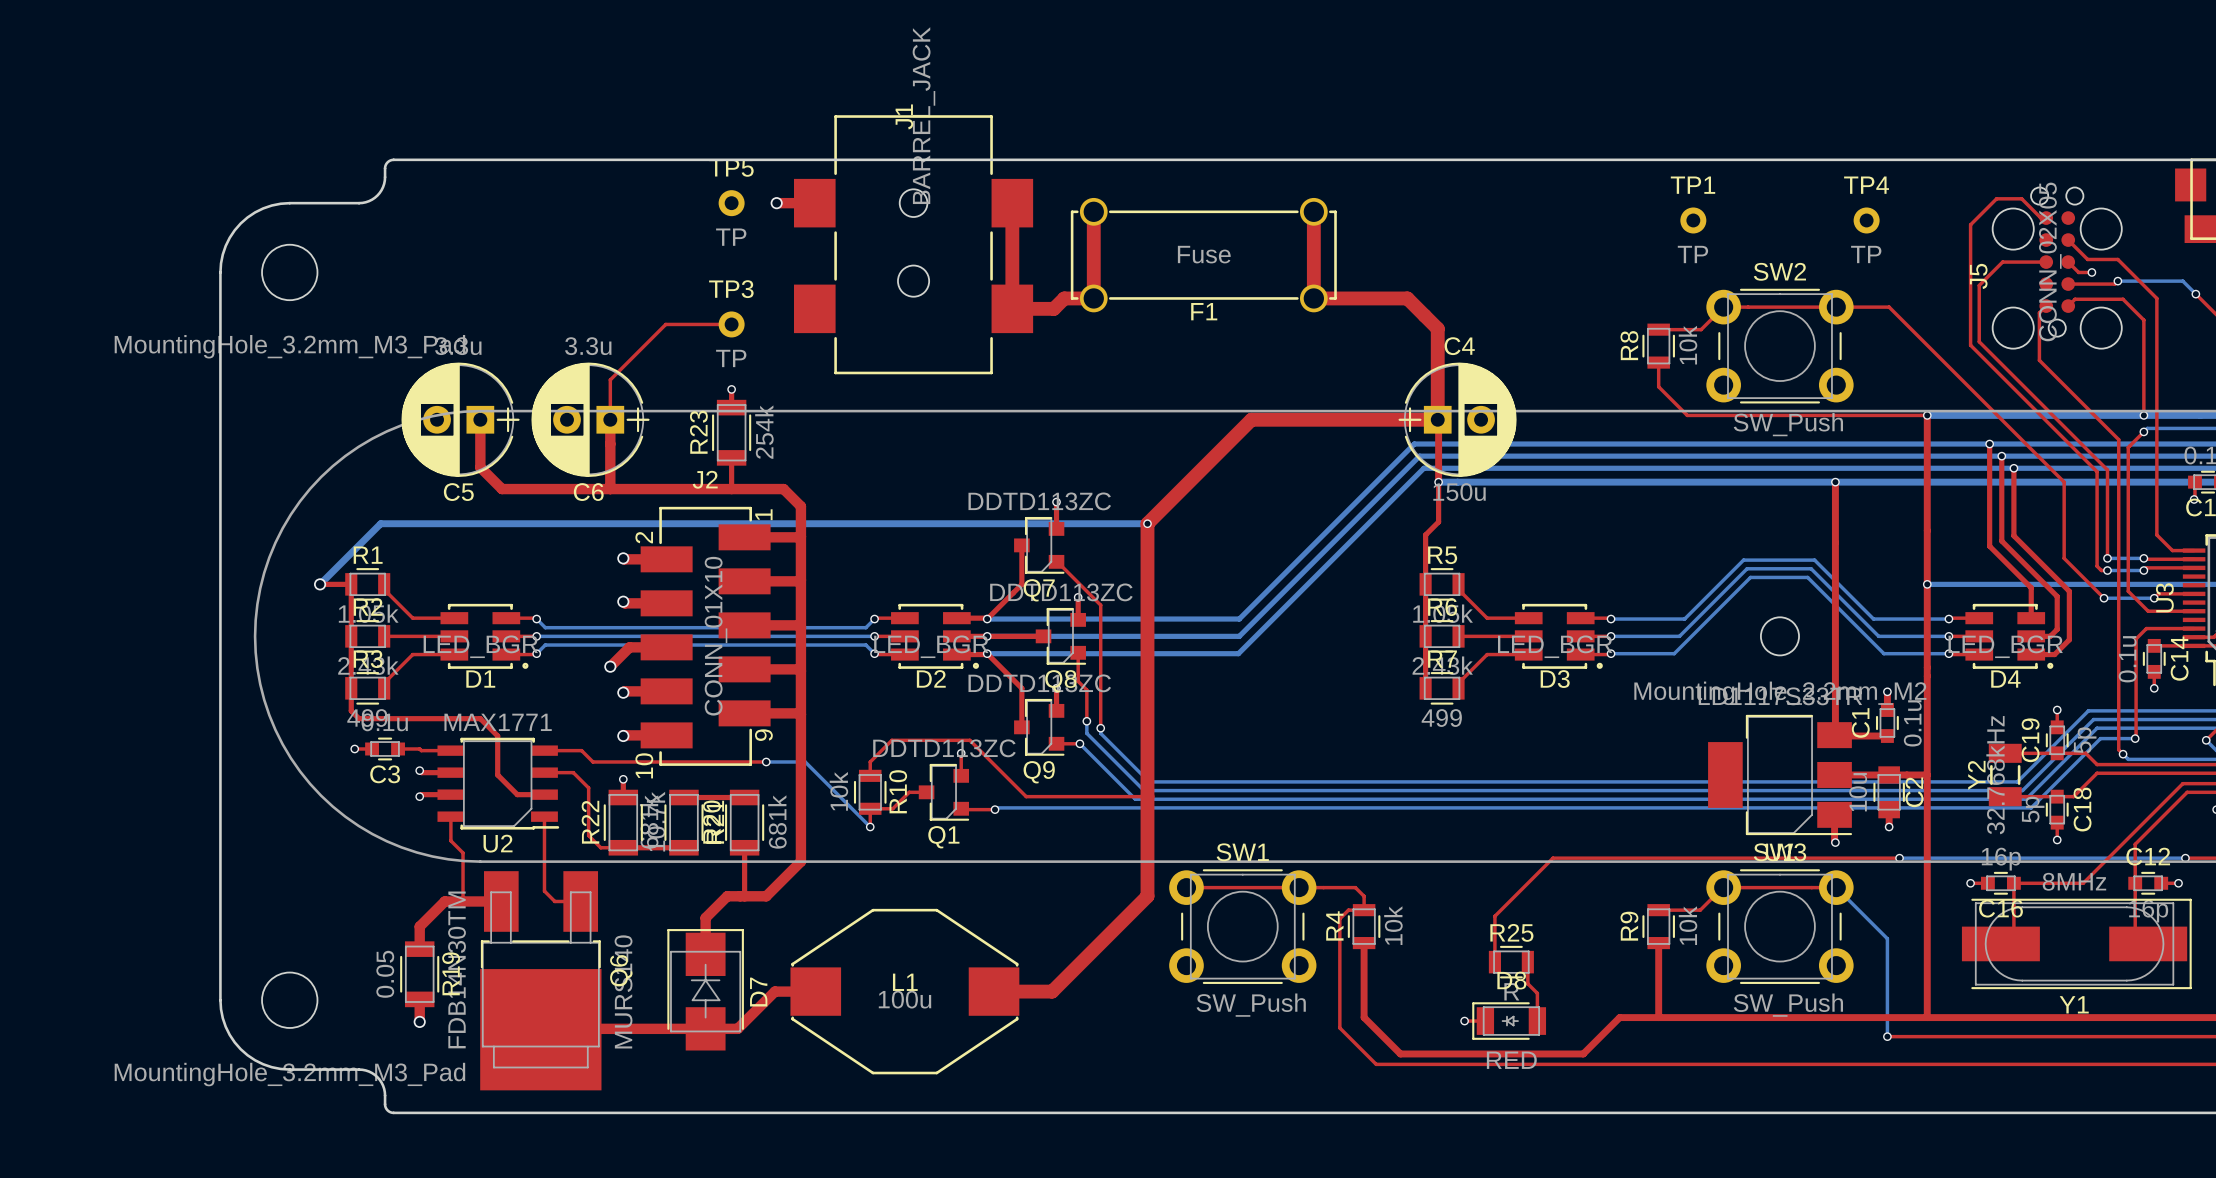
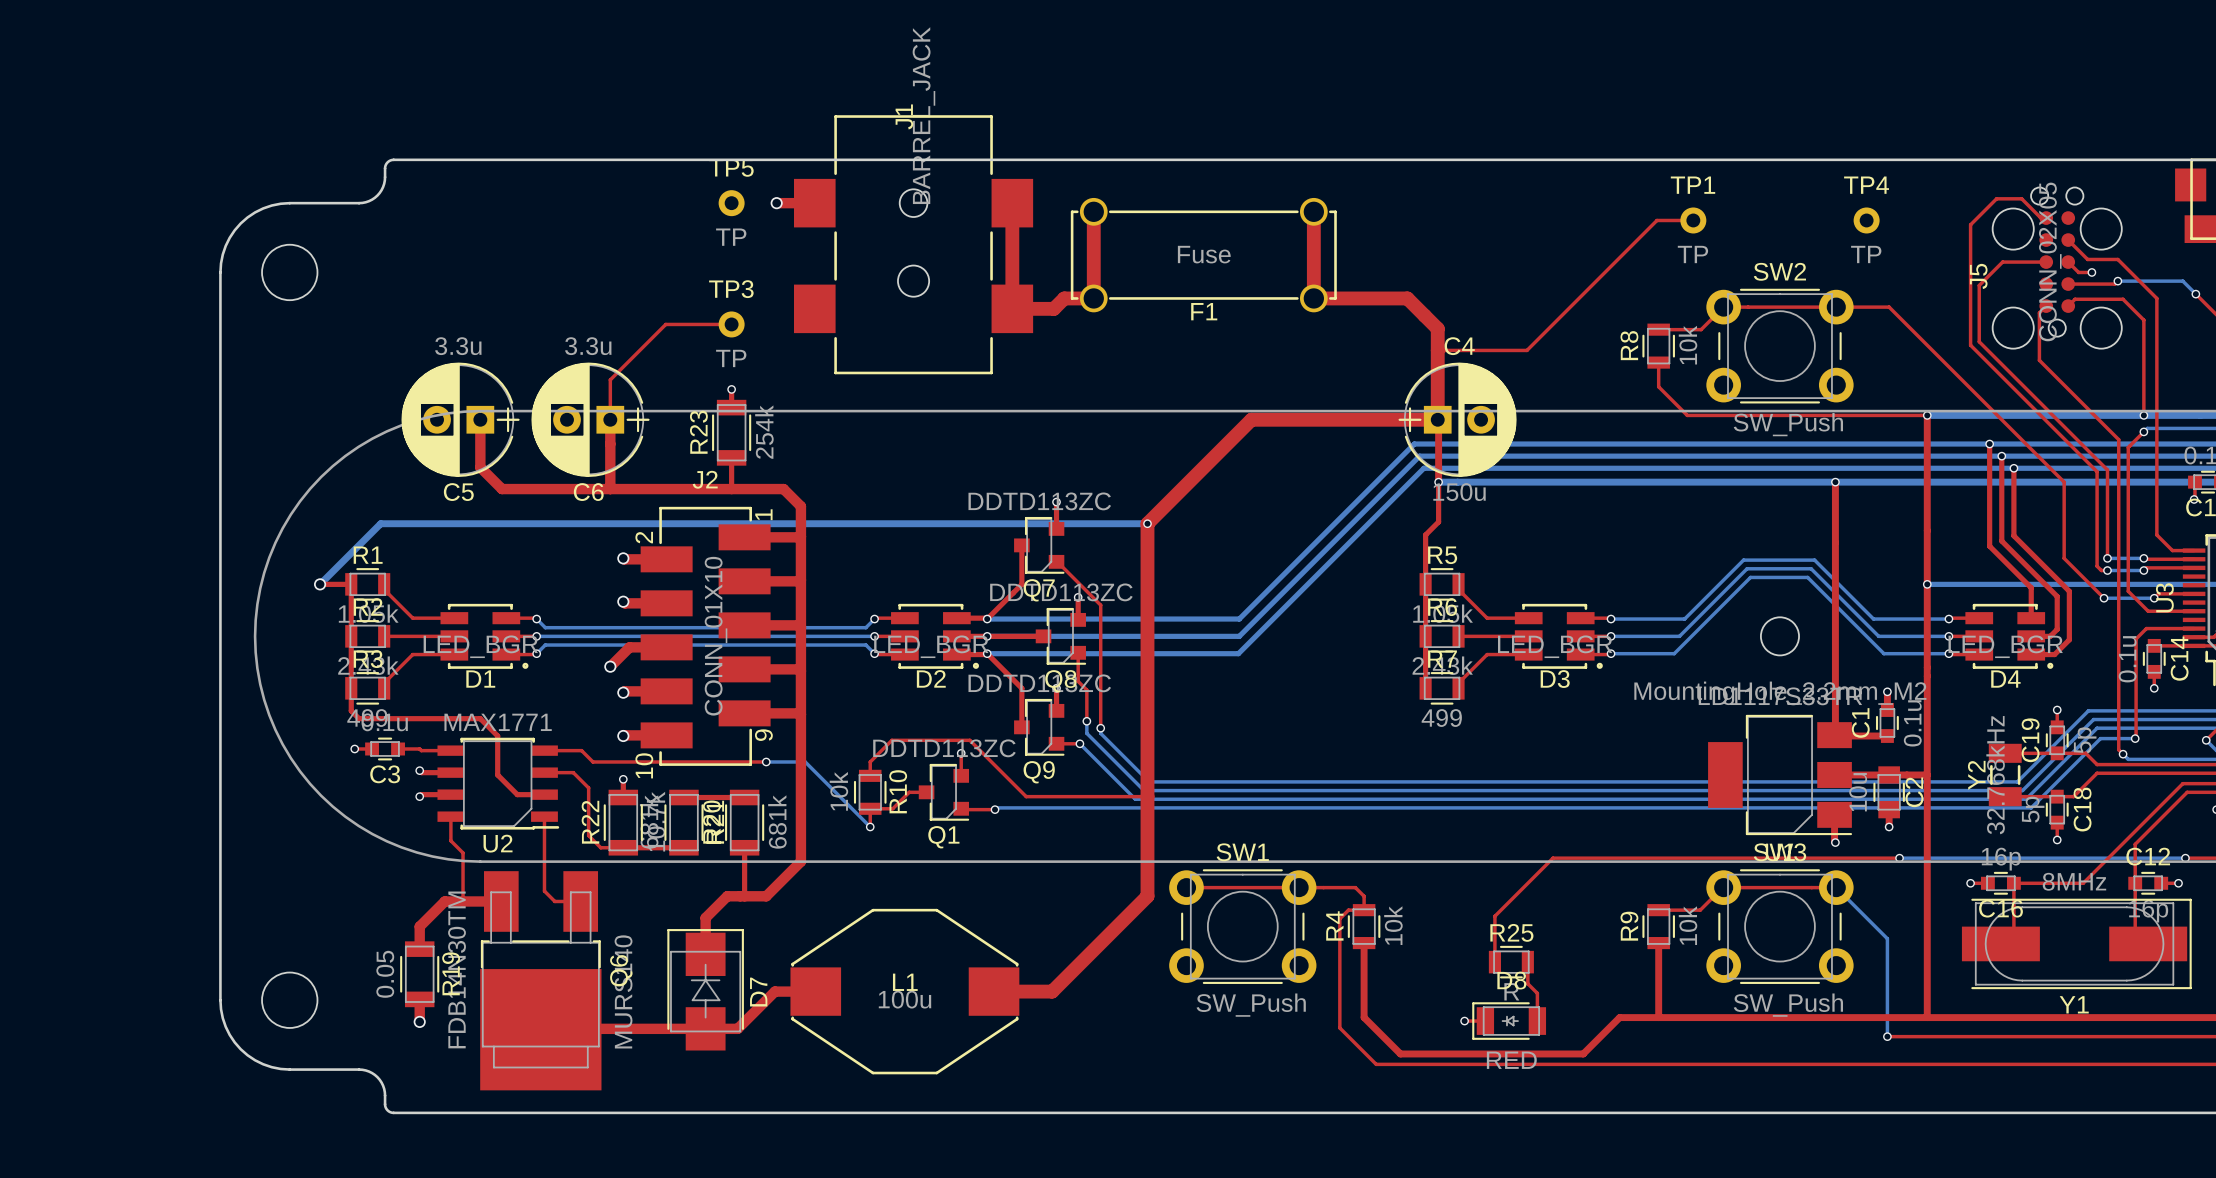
top track: none -> (1693, 220) (1656, 220) (1526, 350) (1437, 350)
part value: MountingHole_3.2mm_M3_Pad (289, 346) -> none
part value: MountingHole_3.2mm_M3_Pad (289, 1074) -> none

